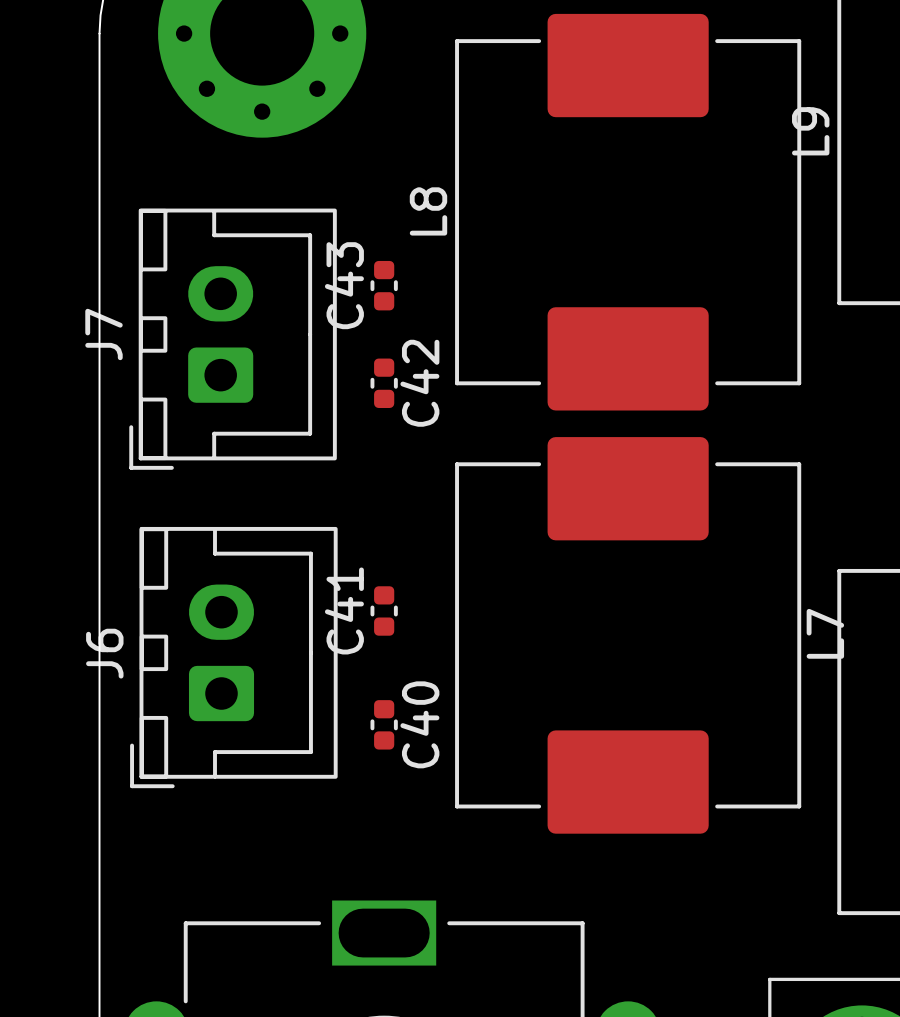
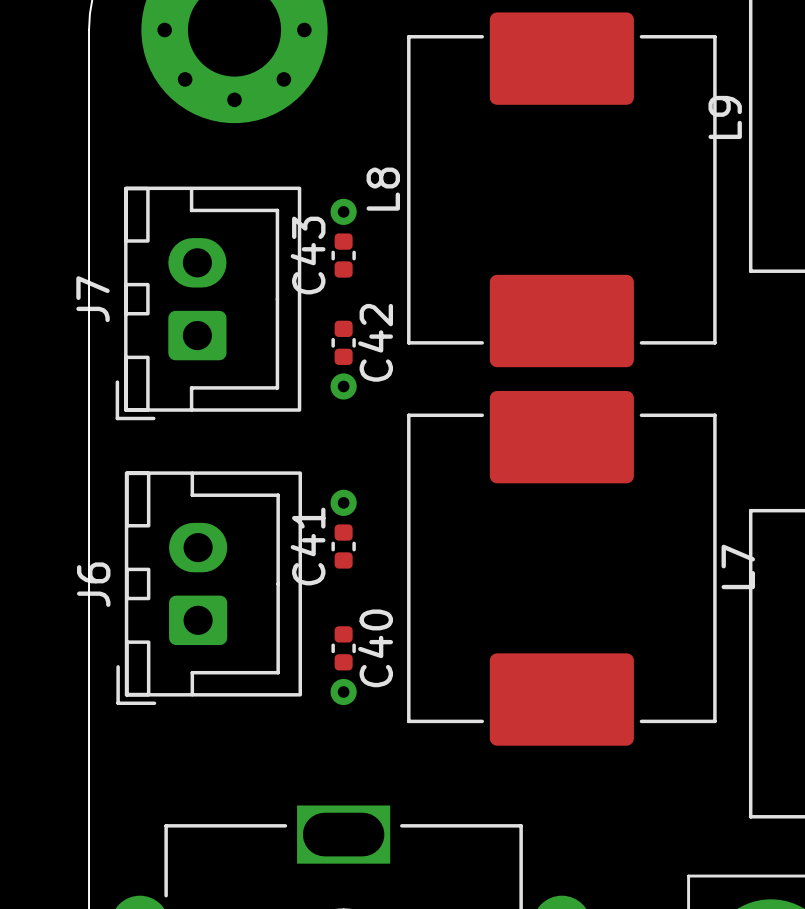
via: none -> (343, 211)
via: none -> (343, 386)
via: none -> (343, 502)
via: none -> (343, 692)

